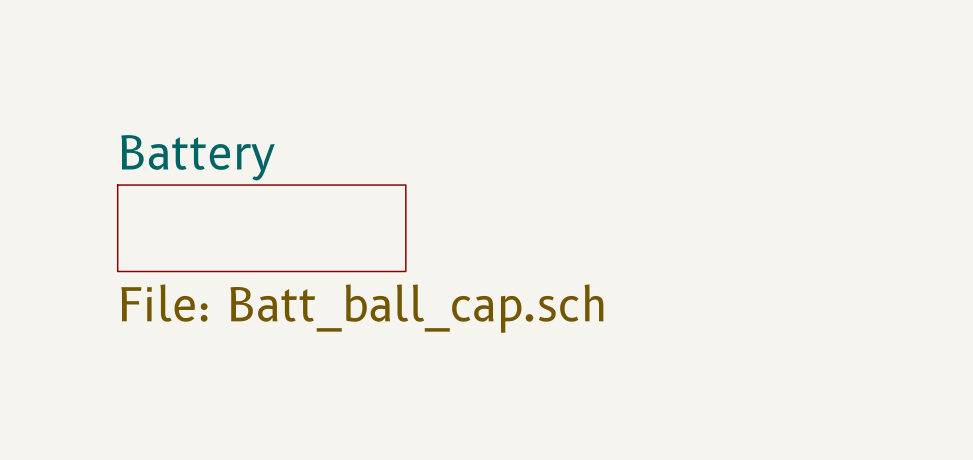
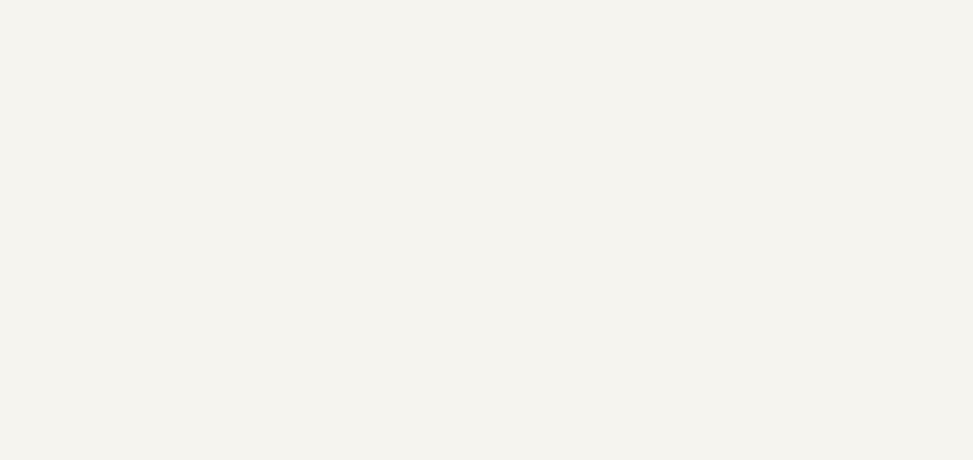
sheet Battery: File: Batt_ball_cap.sch (261, 228) -> none

